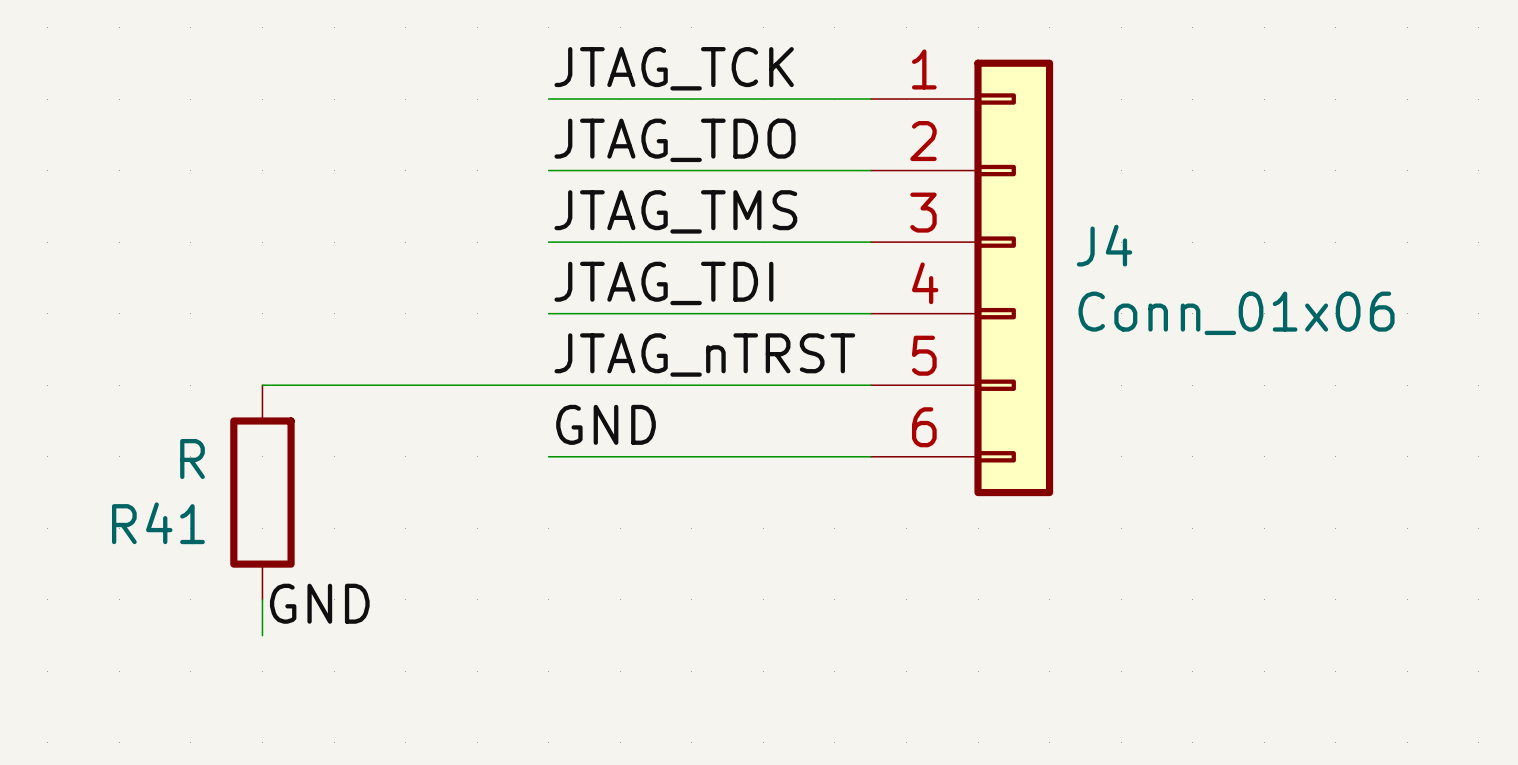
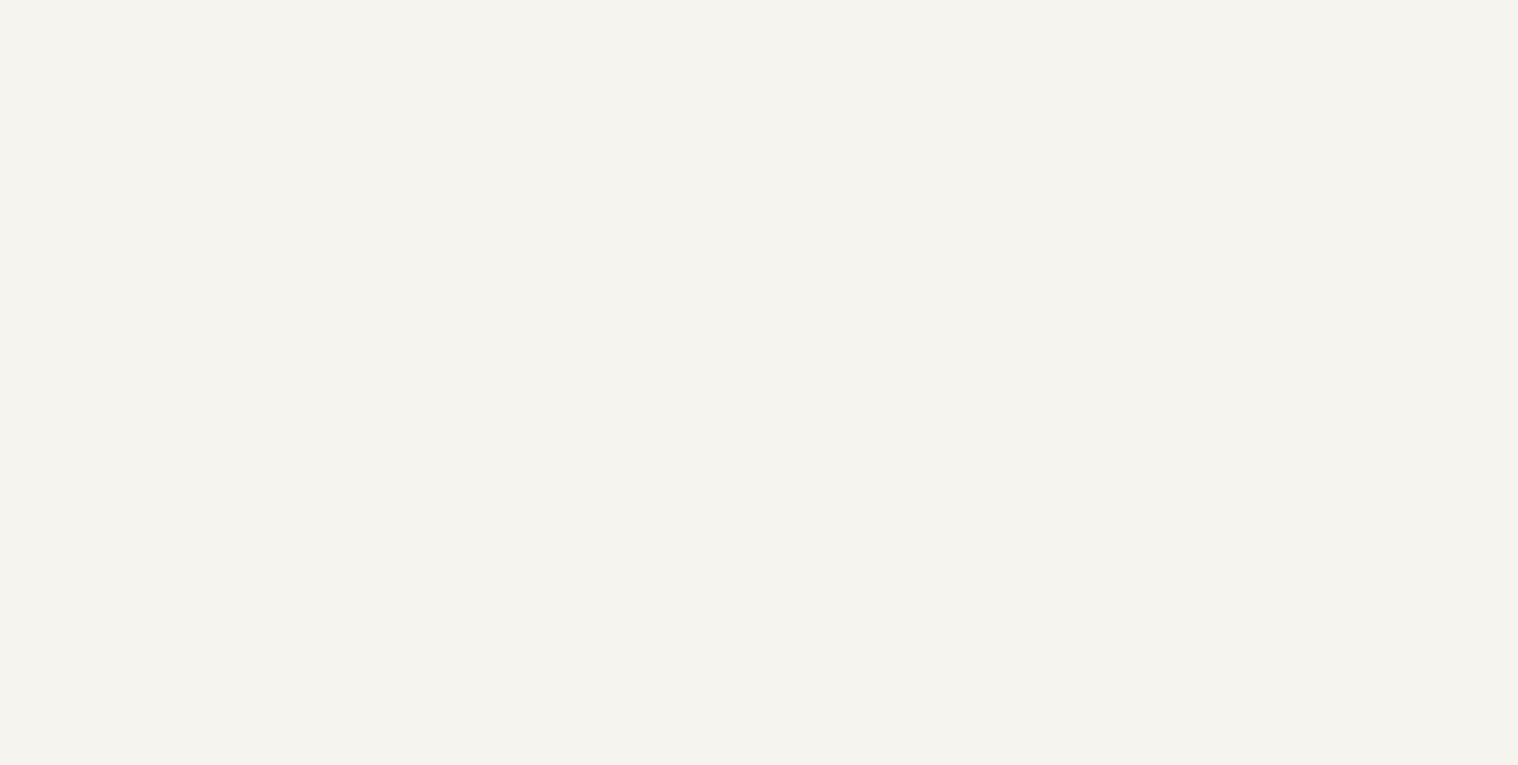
label: JTAG_TCK (674, 68) -> none
wire: (548, 99) (870, 99) -> none
label: JTAG_TDO (675, 140) -> none
wire: (548, 170) (870, 170) -> none
label: JTAG_TMS (675, 211) -> none
wire: (548, 242) (870, 242) -> none
J4: Conn_01x06 (961, 277) -> none
label: JTAG_TDI (663, 283) -> none
wire: (548, 313) (870, 313) -> none
label: JTAG_nTRST (704, 355) -> none
wire: (262, 385) (870, 385) -> none
label: GND (606, 424) -> none
wire: (548, 456) (870, 456) -> none
R41: R (262, 492) -> none
wire: (262, 599) (262, 635) -> none
label: GND (319, 603) -> none

